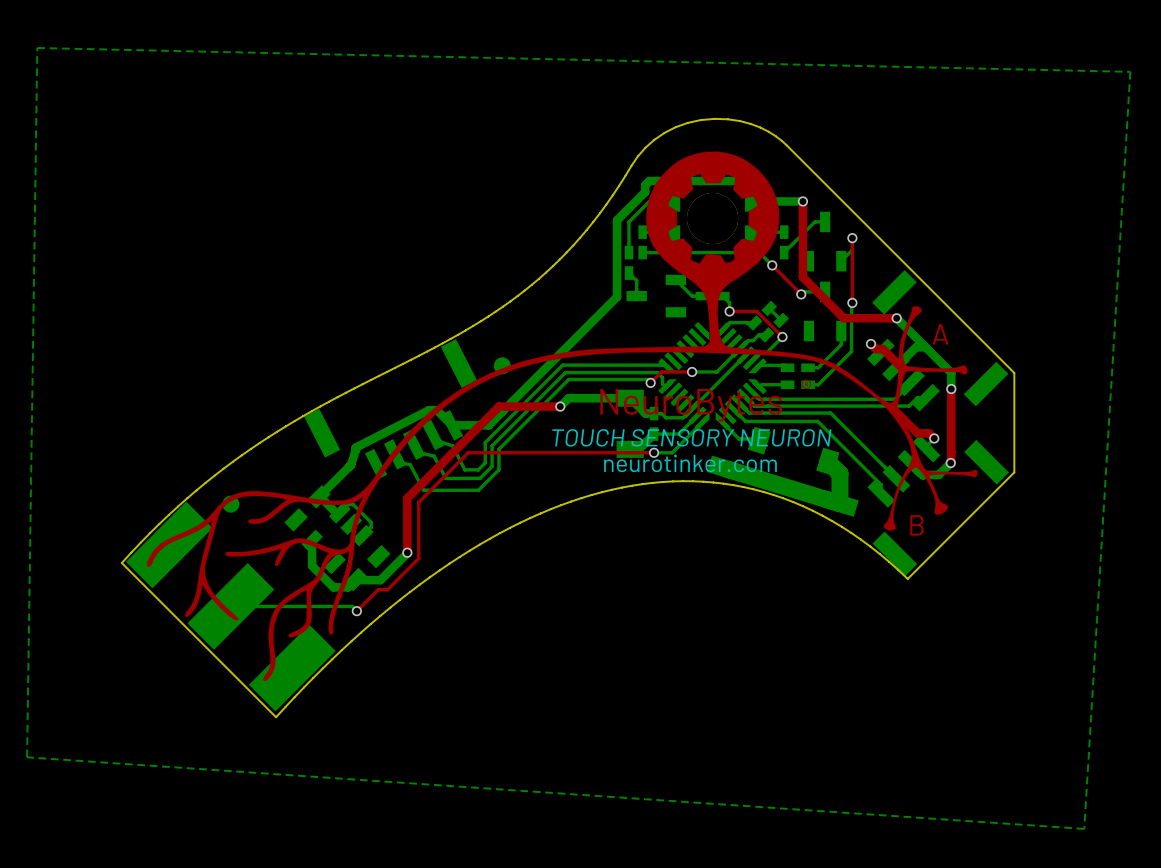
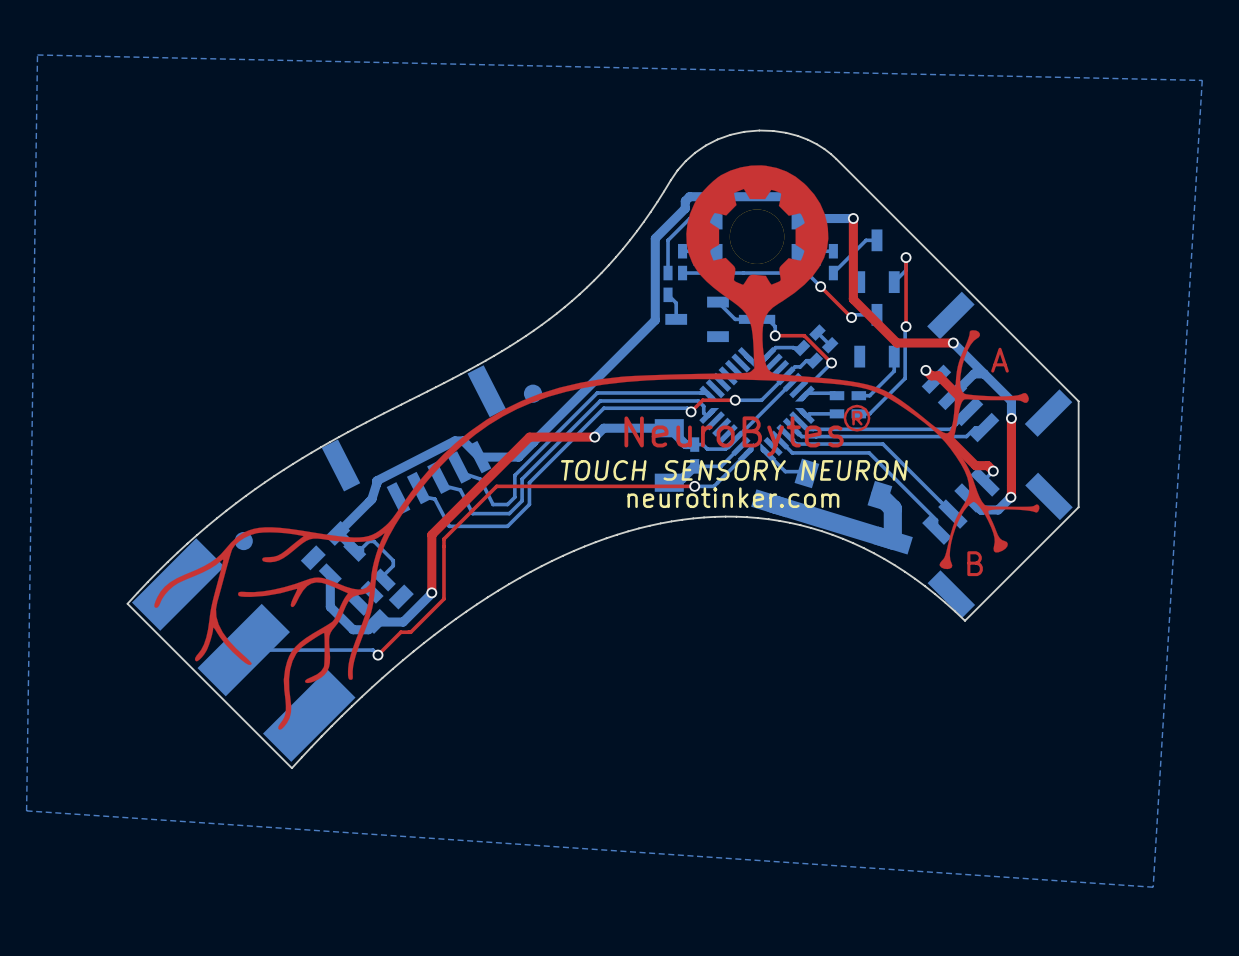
part rotation: 0° (337, 538) -> 90° clockwise (357, 577)

